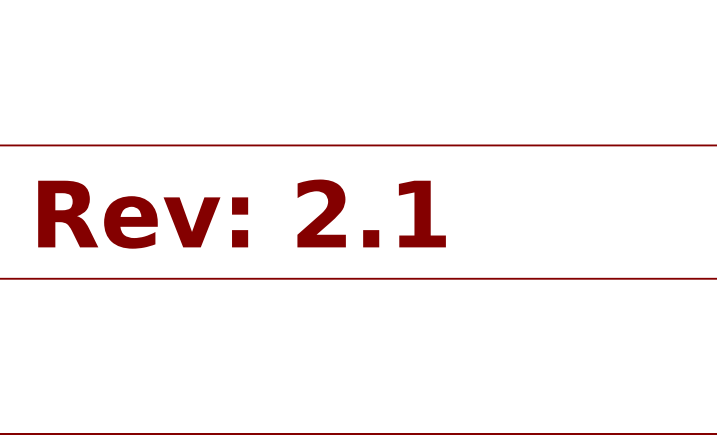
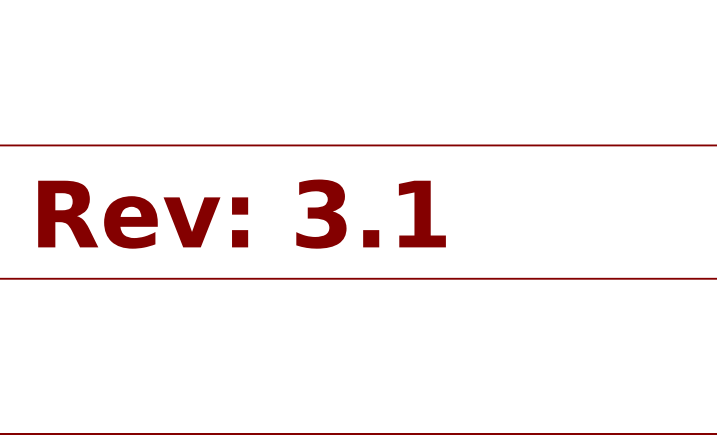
title block: Rev: 2.1 (242, 214) -> Rev: 3.1 (242, 214)

